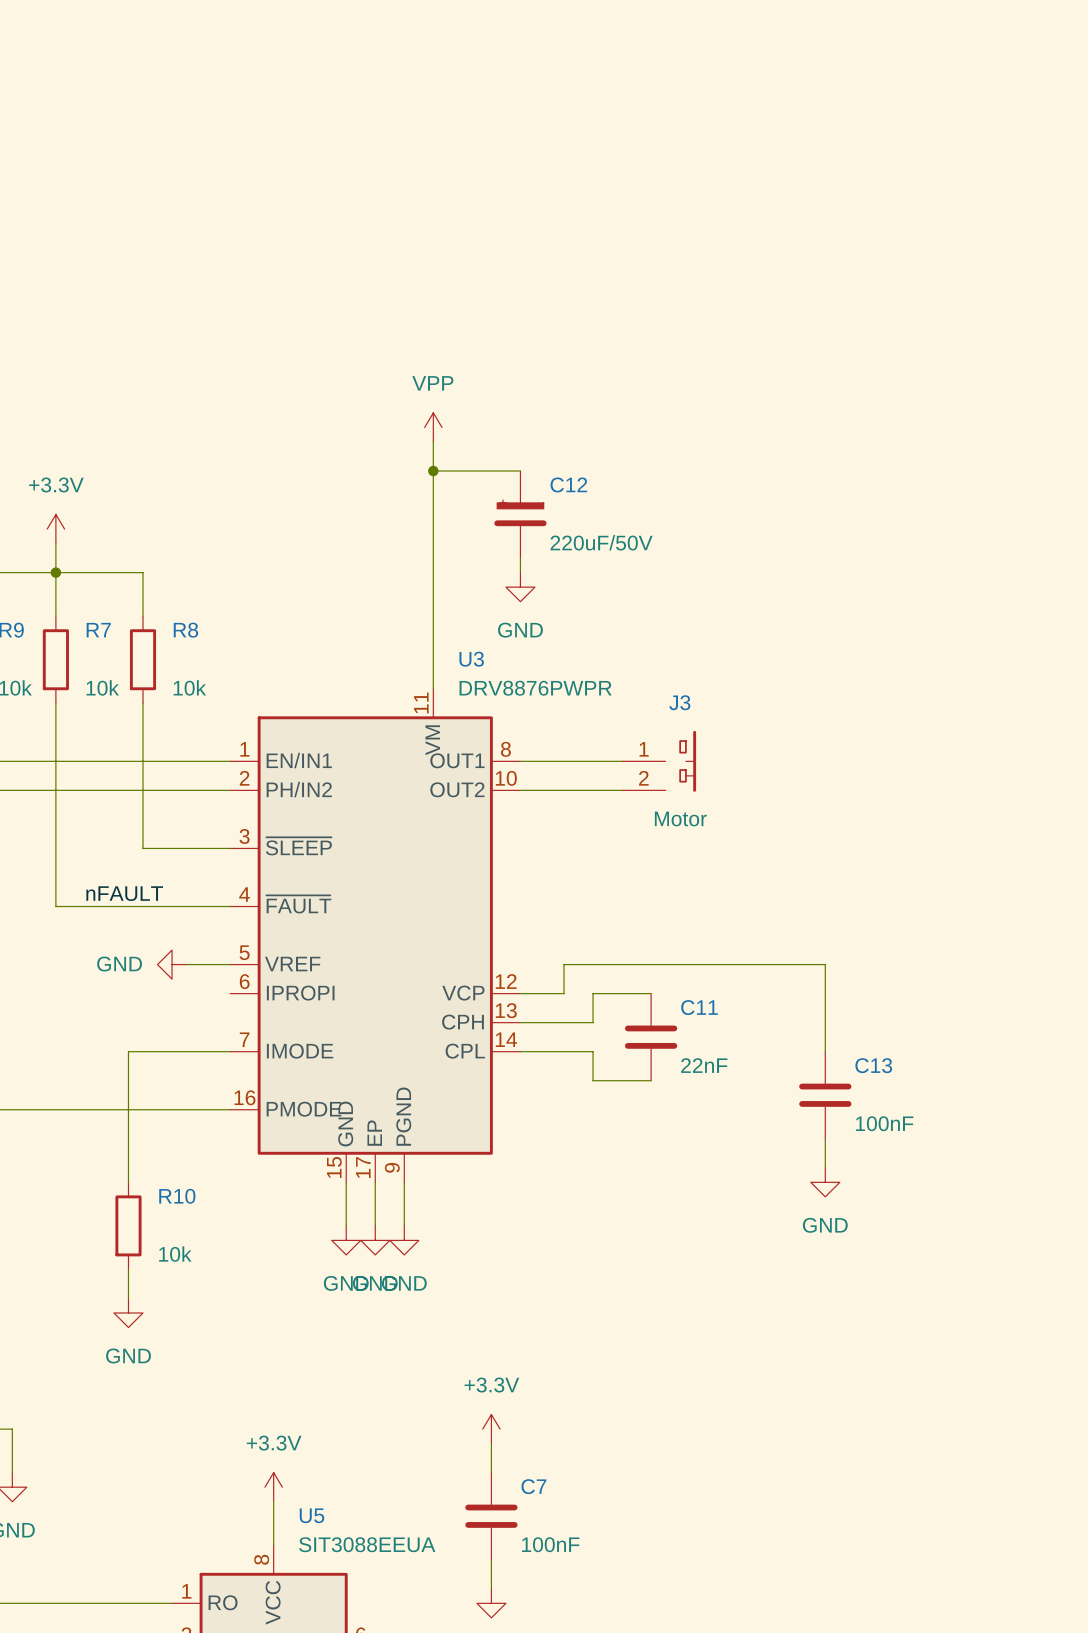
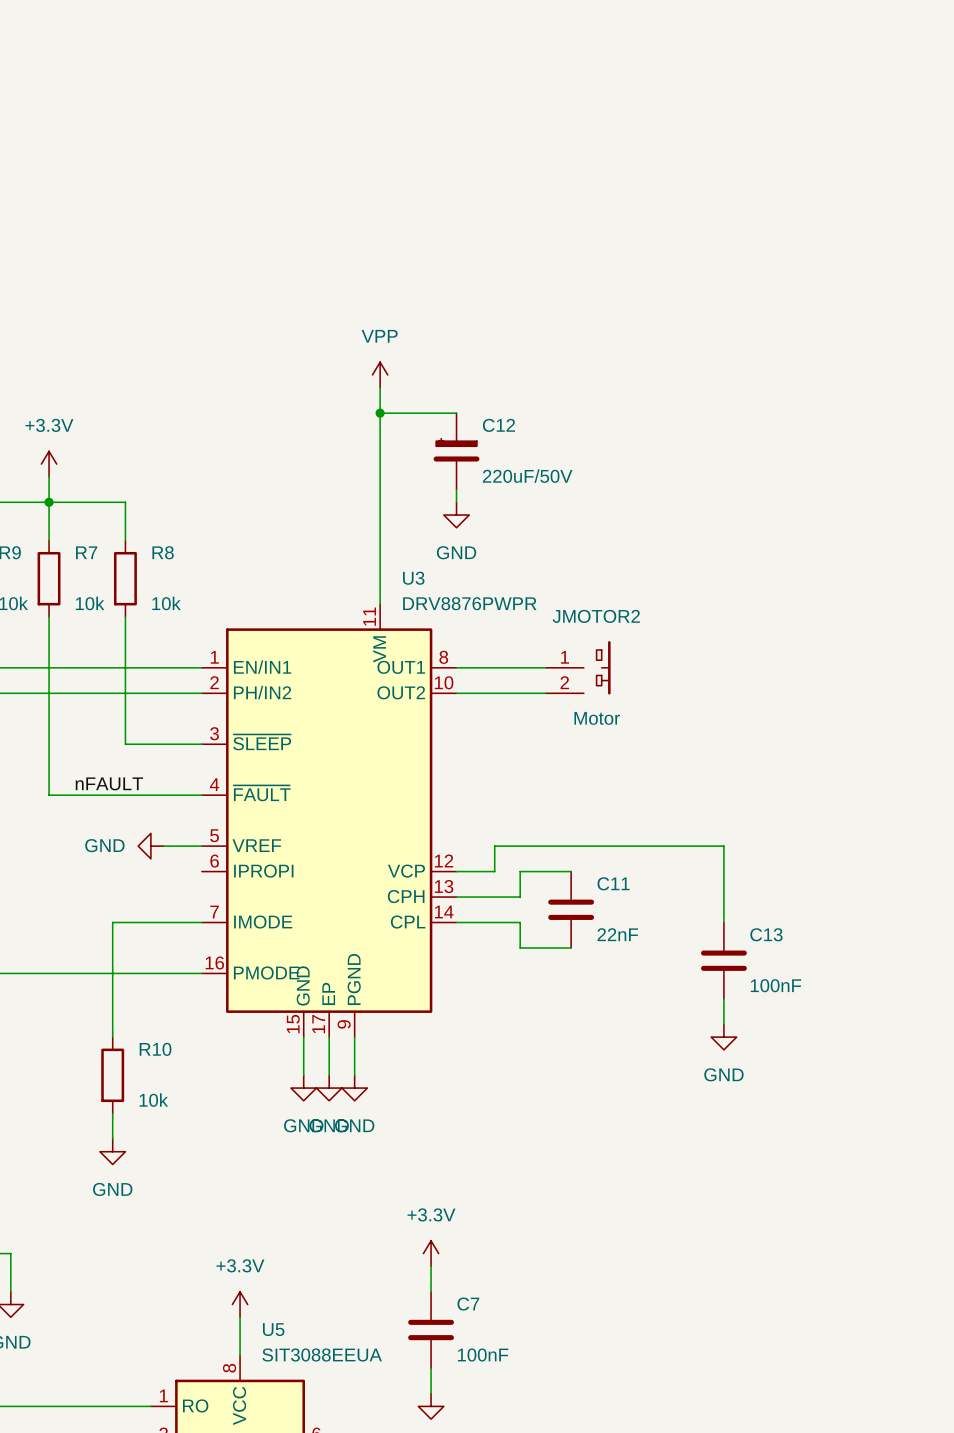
J3 name: J3 (679, 702) -> JMOTOR2 (596, 616)

